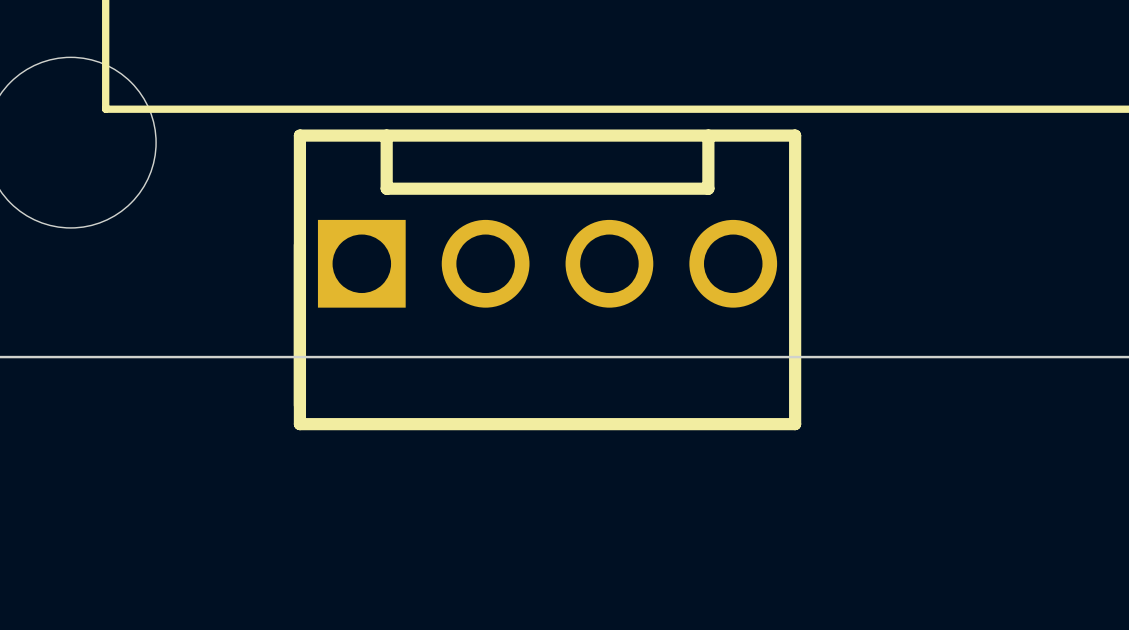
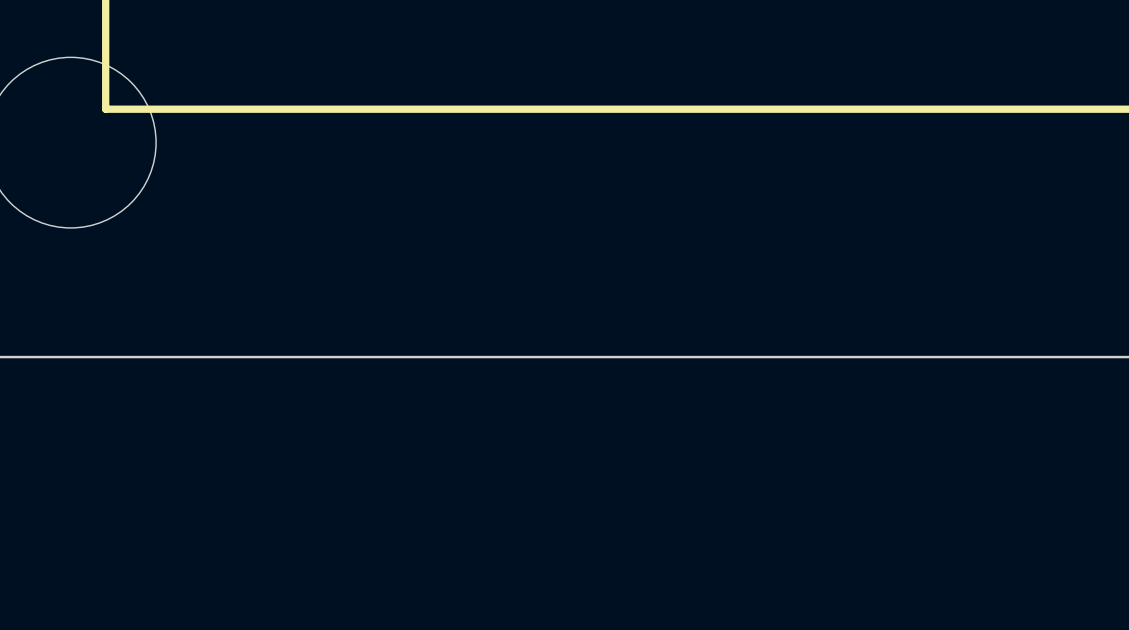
part: (547, 279) -> none

